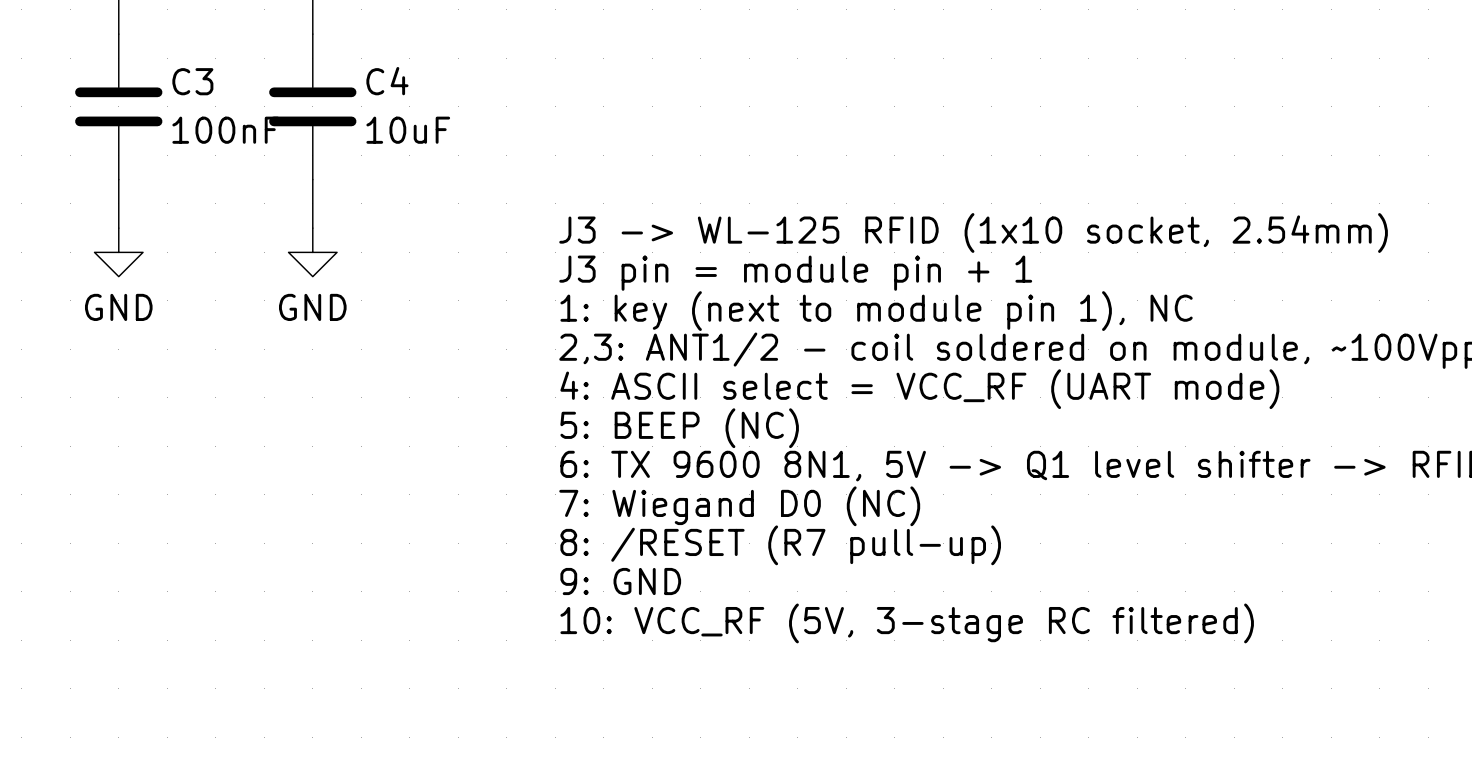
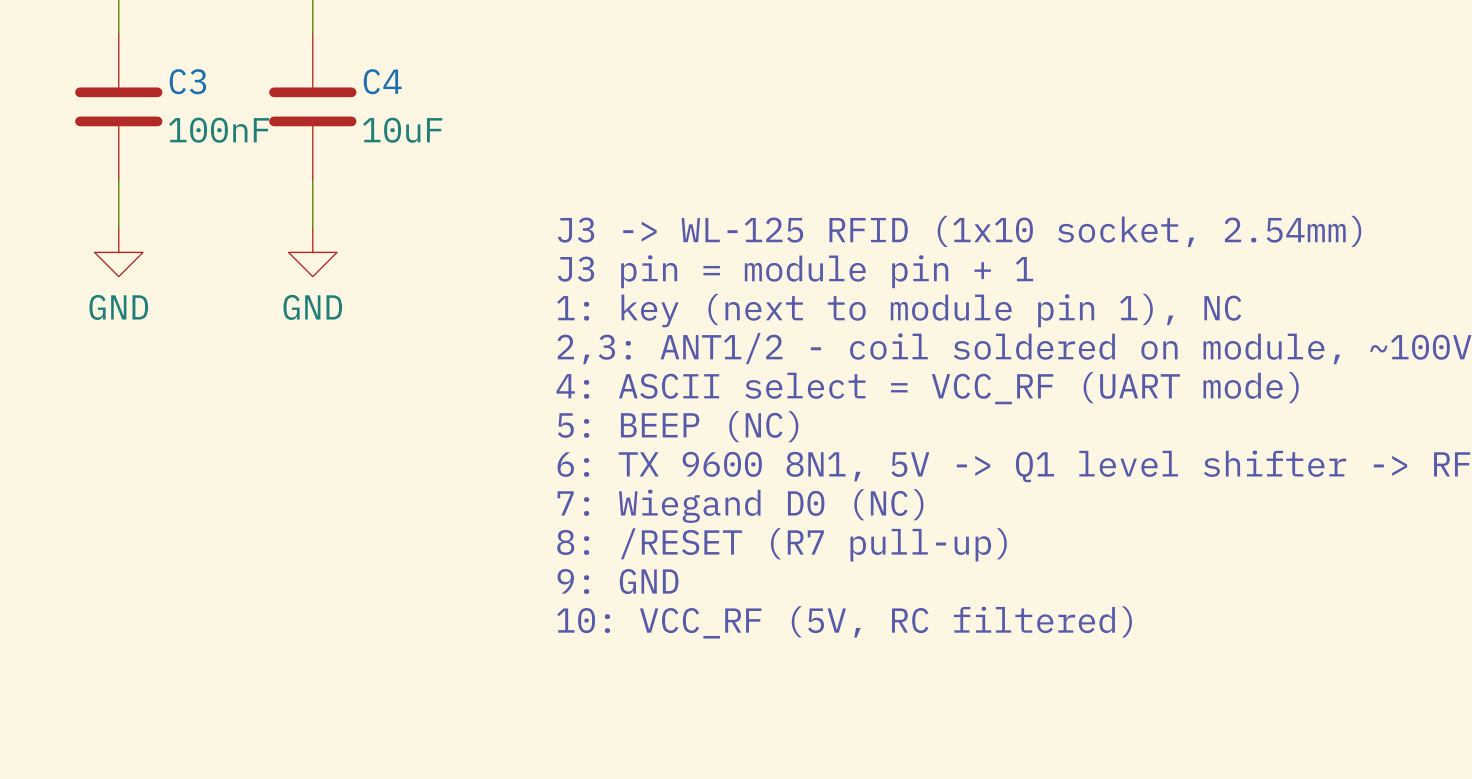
text: 10: VCC_RF (5V, 3-stage RC filtered) (907, 623) -> 10: VCC_RF (5V, RC filtered) (844, 622)

